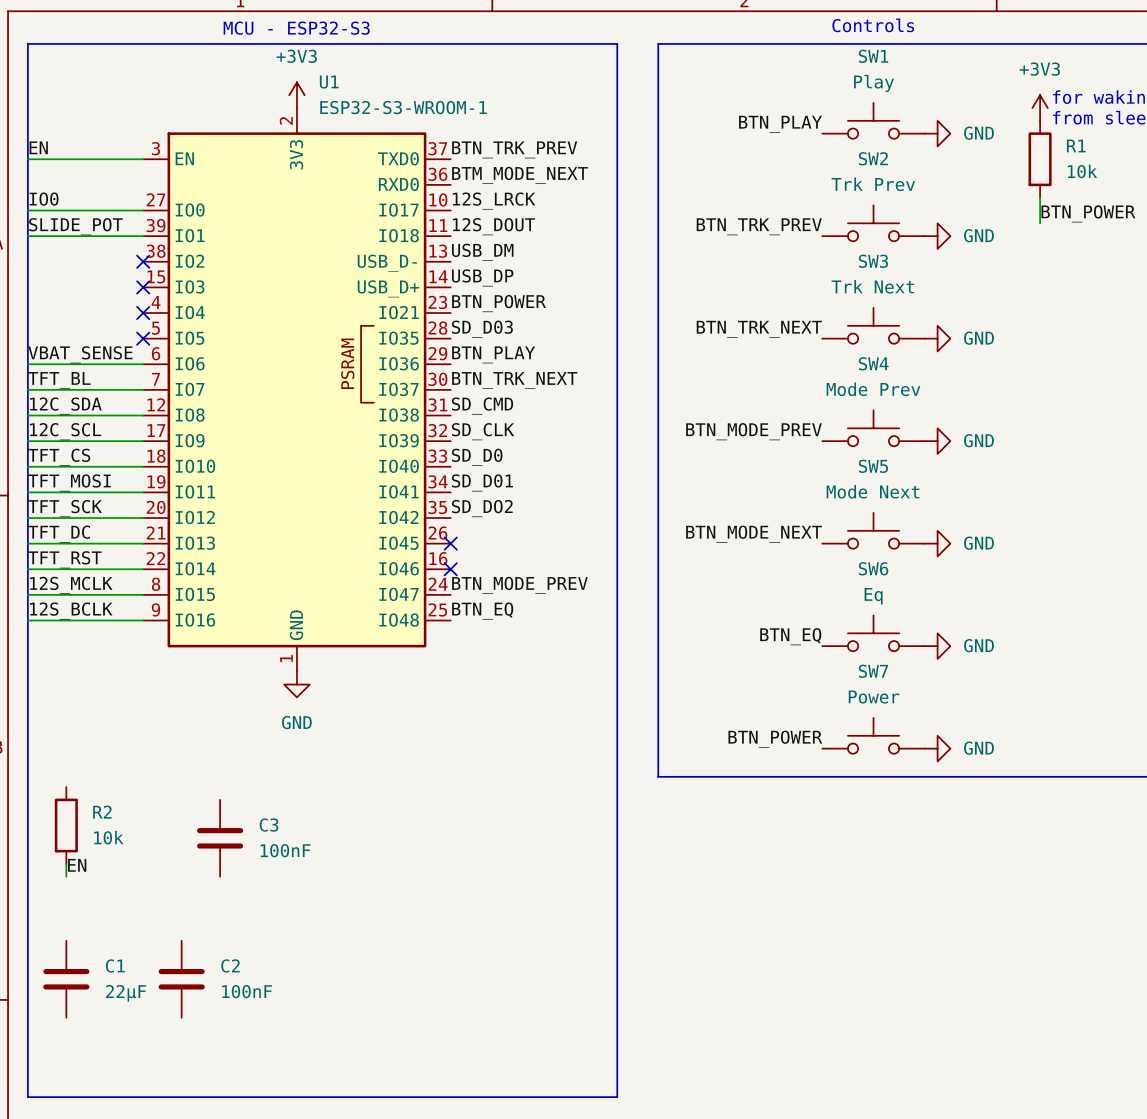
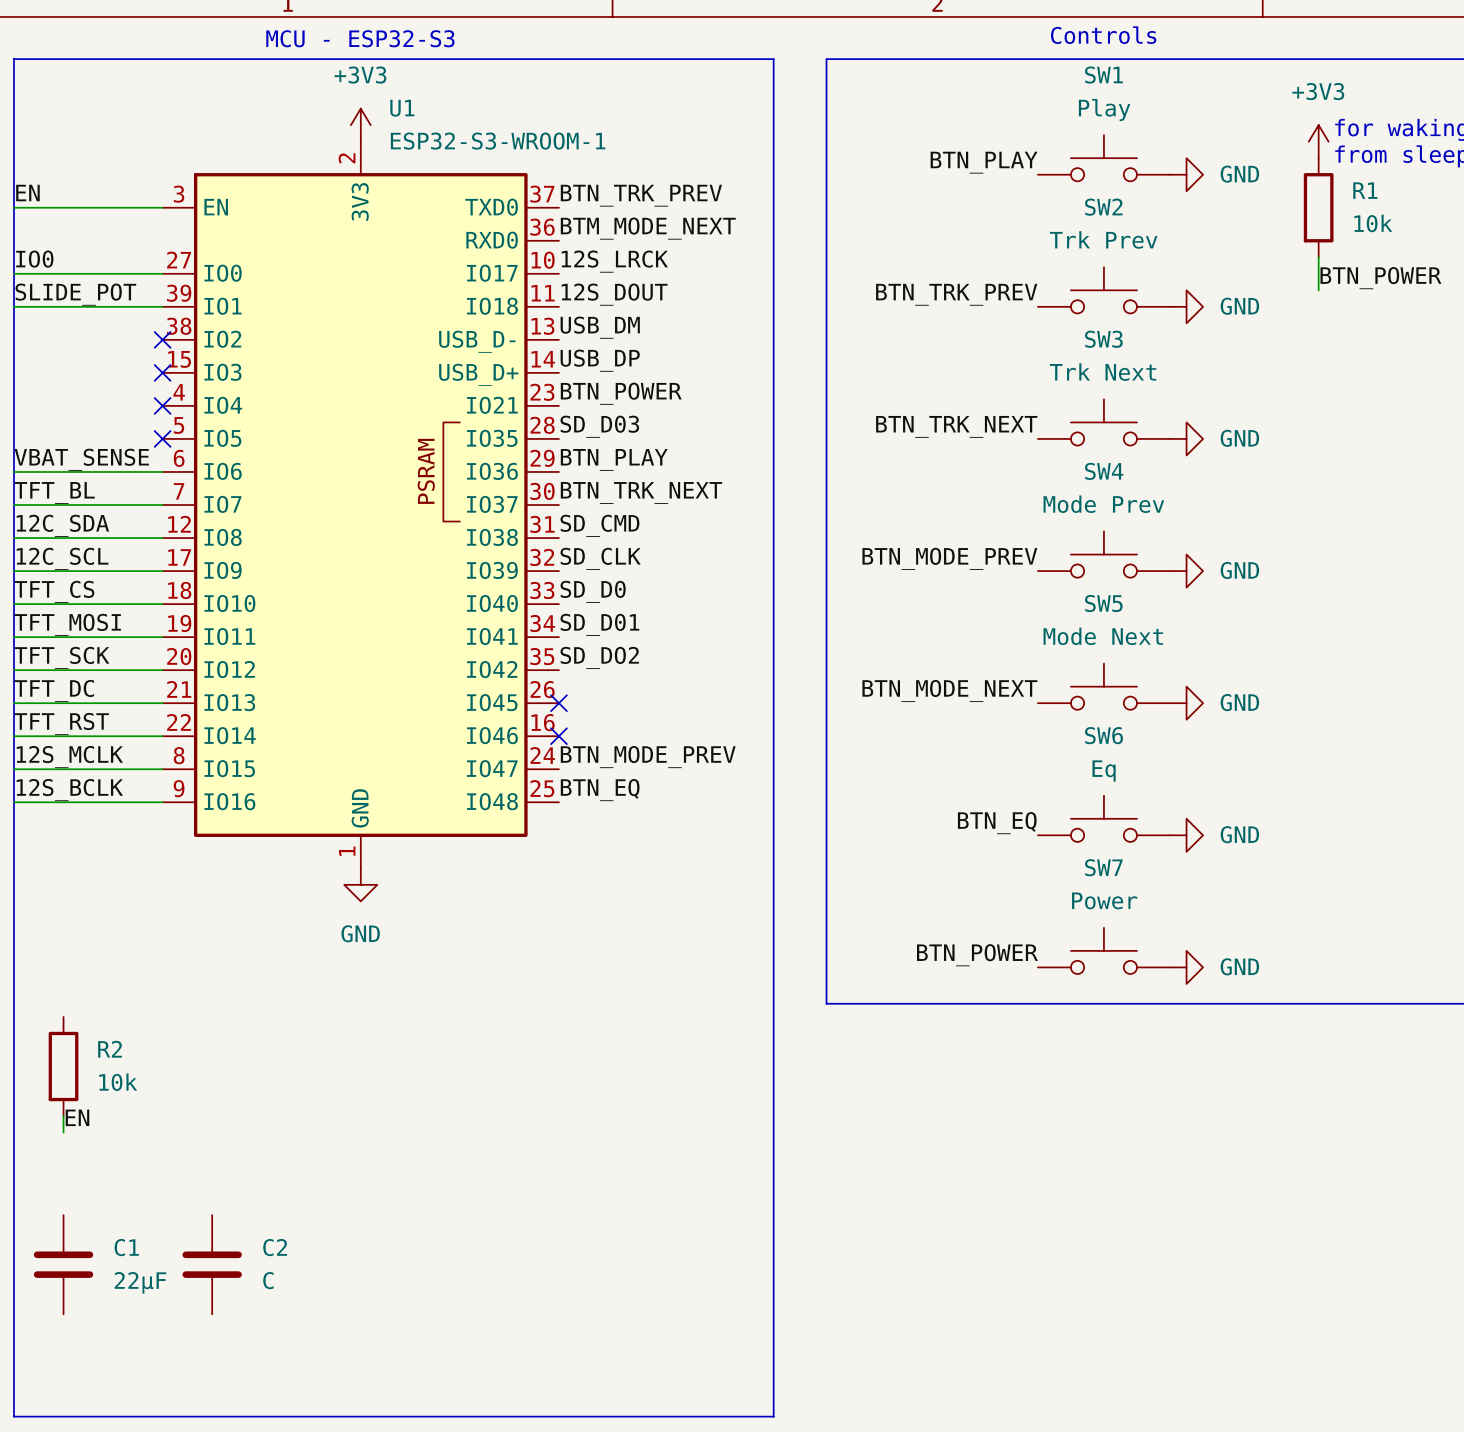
C3: 100nF (220, 838) -> none
C2 value: 100nF (247, 991) -> C (268, 1280)

